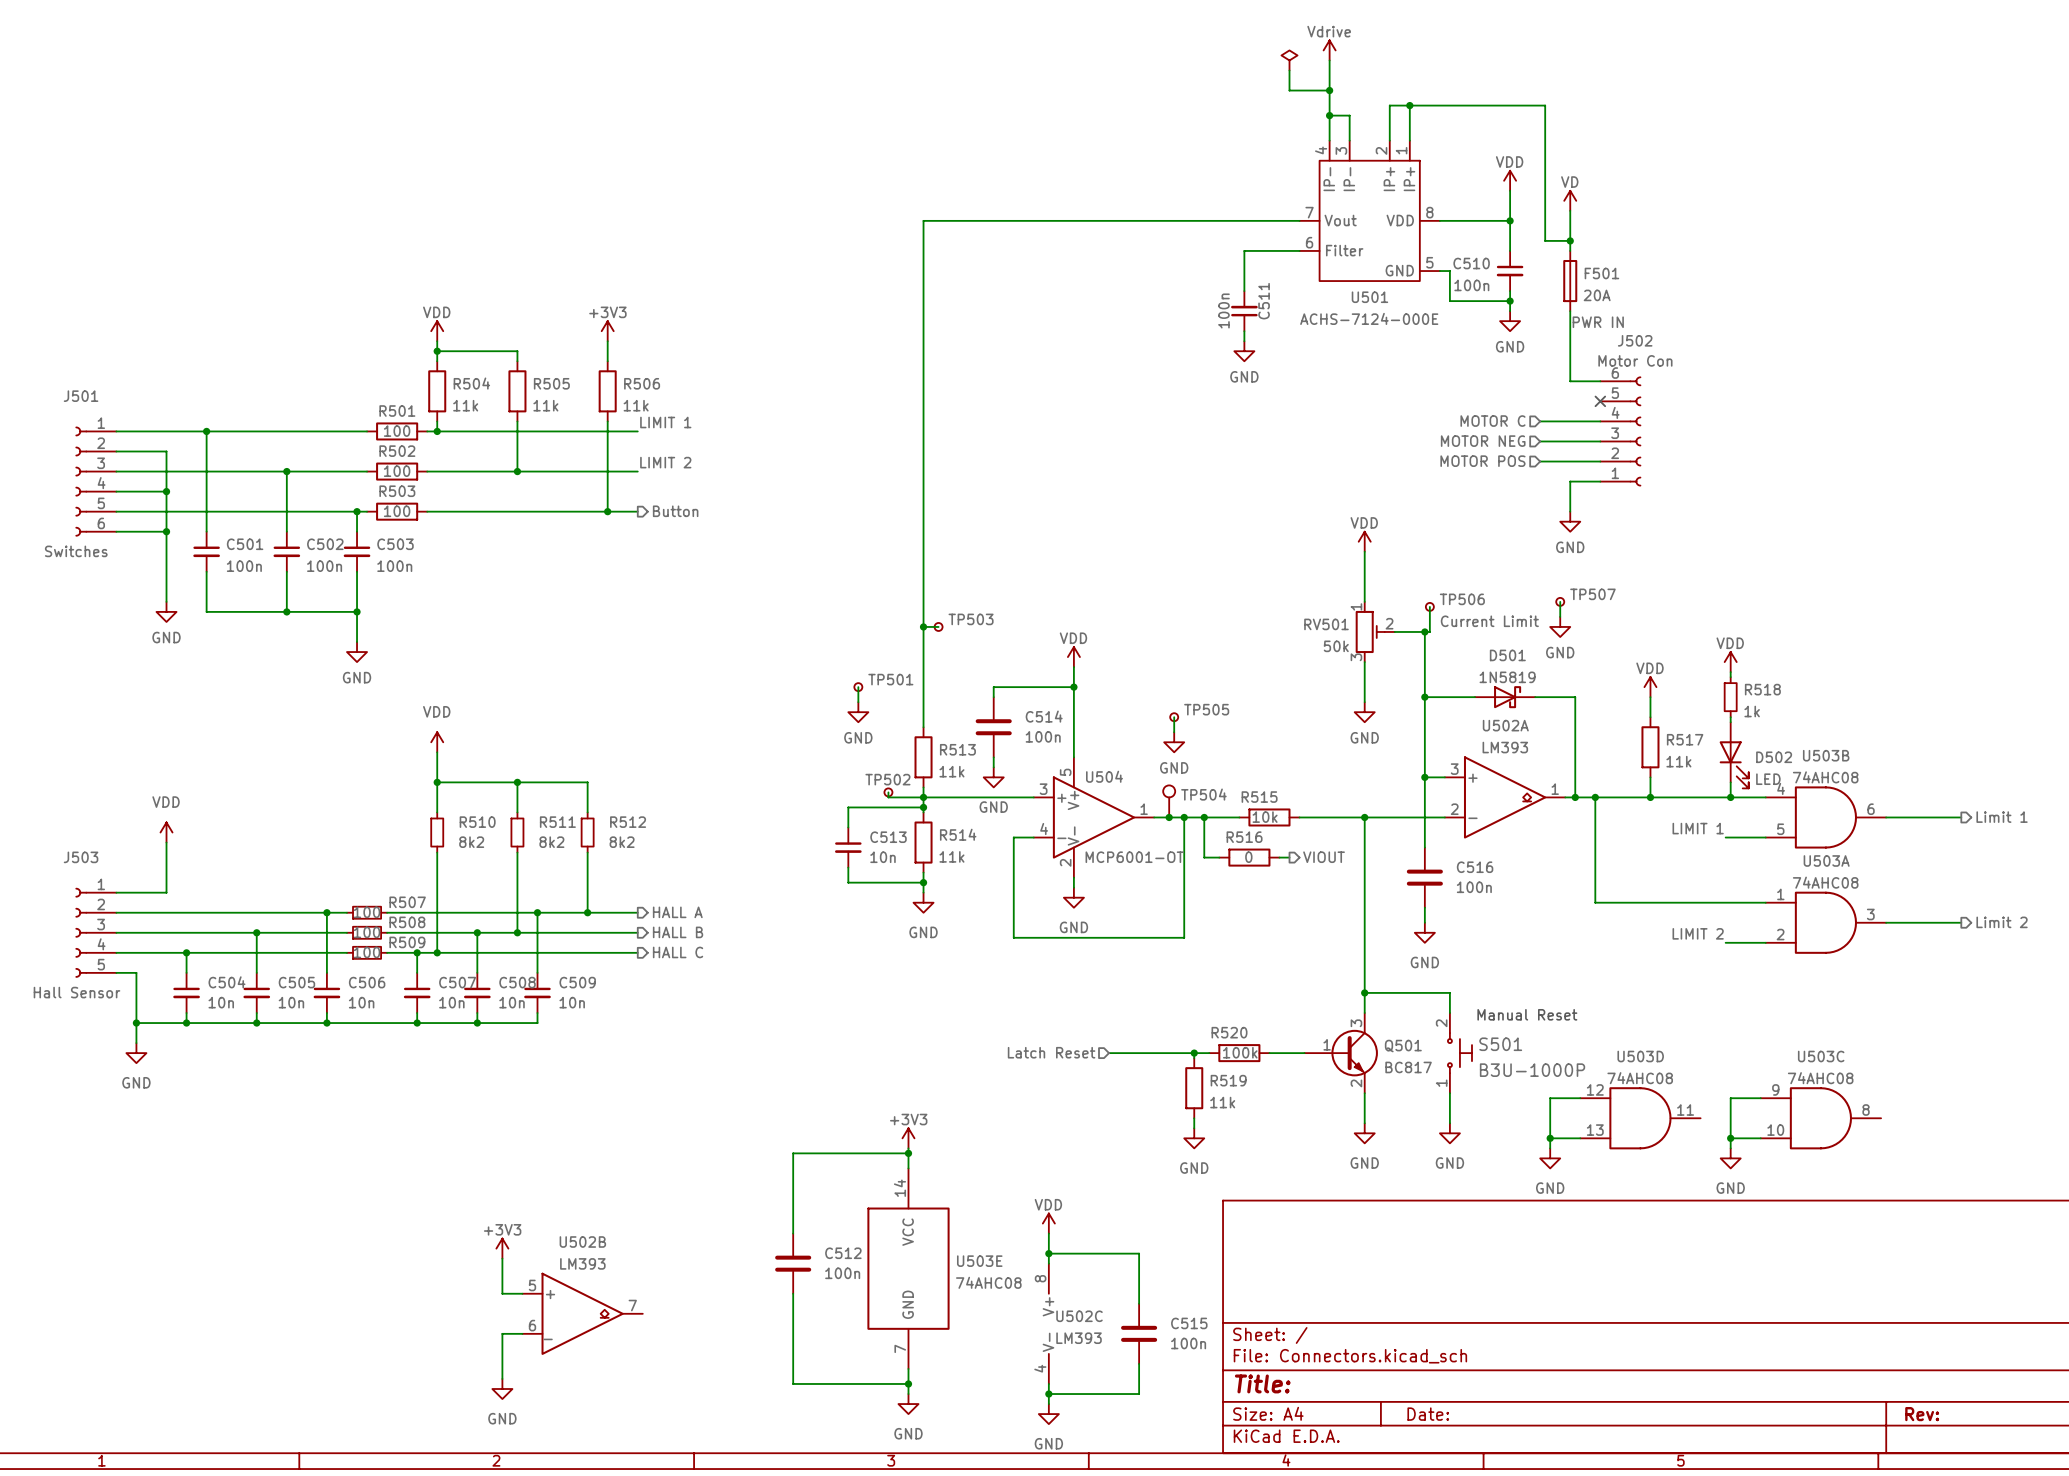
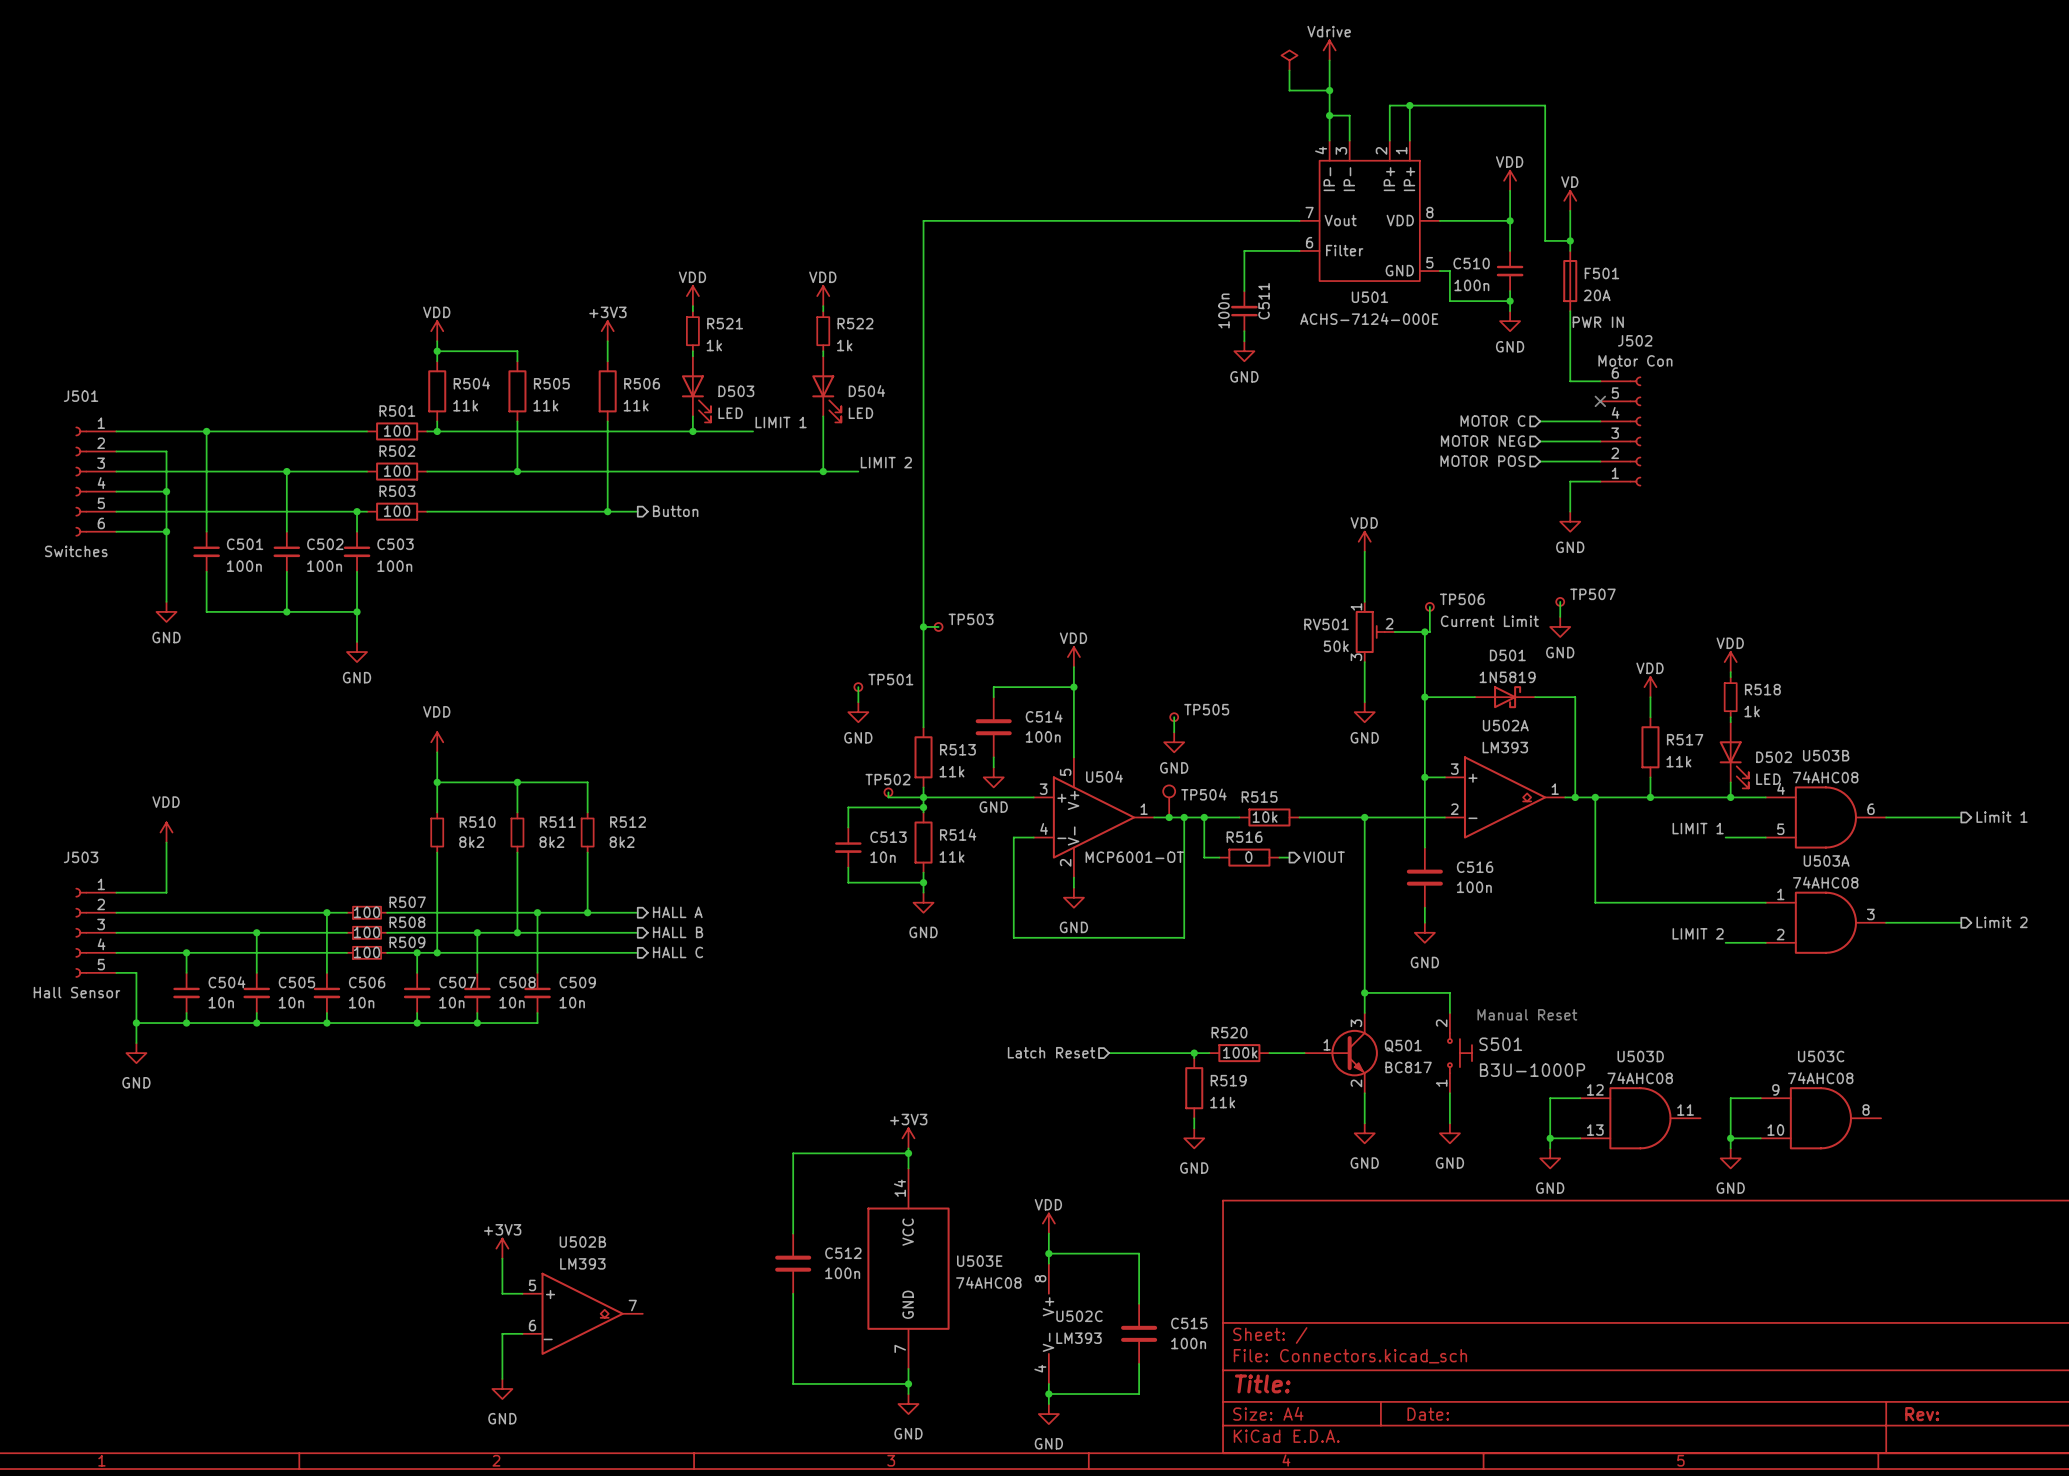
power symbol: none -> VDD (692, 296)
power symbol: none -> VDD (823, 296)
wire: none -> (692, 306) (692, 311)
wire: none -> (823, 306) (823, 311)
R521: none -> 1k (692, 331)
R522: none -> 1k (823, 331)
wire: none -> (692, 351) (692, 356)
wire: none -> (823, 351) (823, 356)
D503: none -> LED (696, 389)
D504: none -> LED (826, 389)
wire: none -> (692, 416) (692, 431)
wire: none -> (823, 416) (823, 471)
label position: LIMIT 1 (665, 422) -> LIMIT 1 (781, 422)
wire: none -> (637, 431) (753, 431)
junction: none -> (692, 431)
label: LIMIT 2 (665, 462) -> none
label: none -> LIMIT 2 (886, 462)
wire: none -> (637, 471) (858, 471)
junction: none -> (823, 471)

